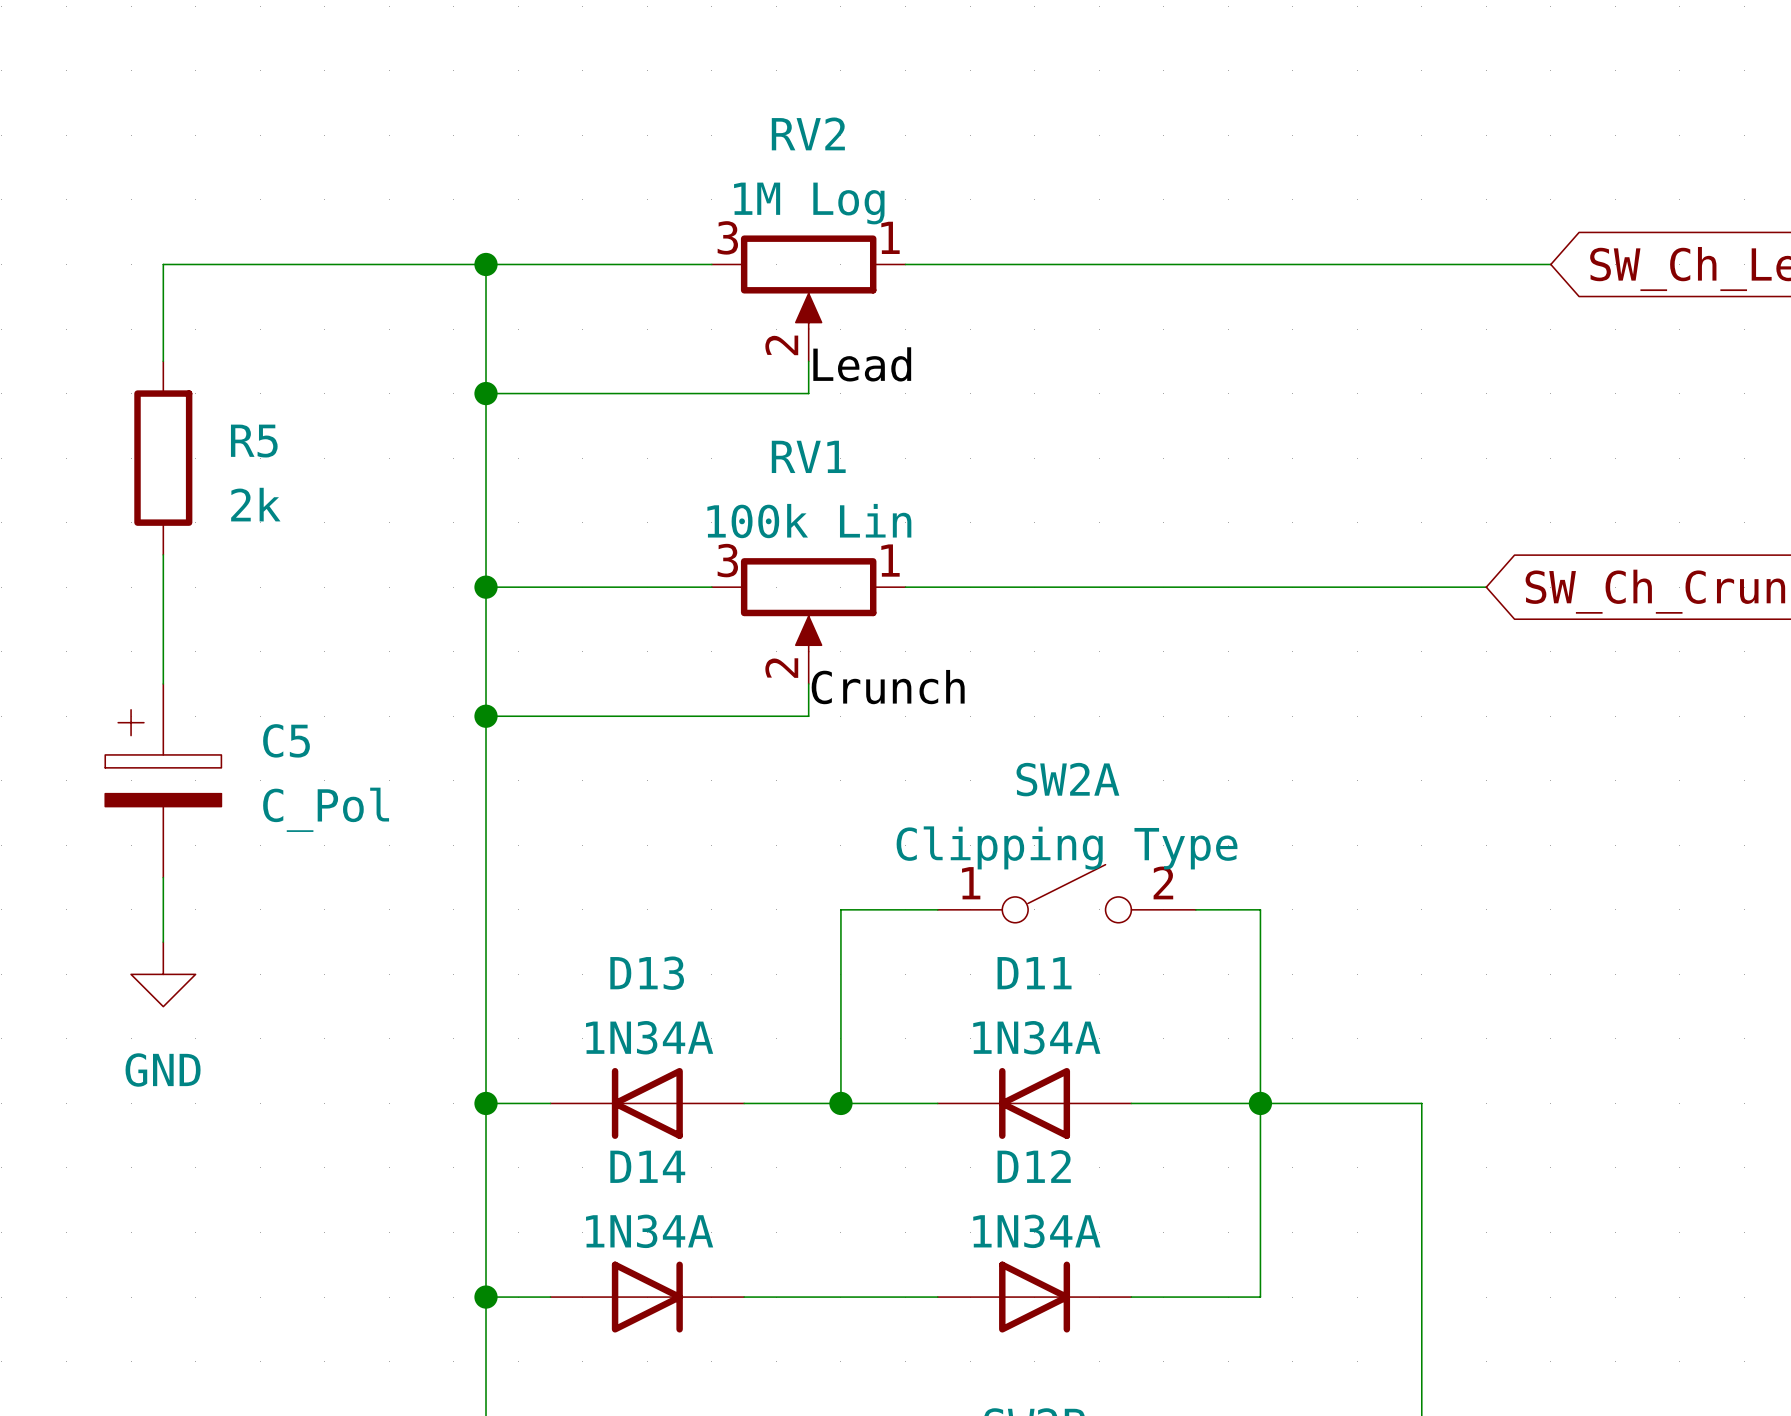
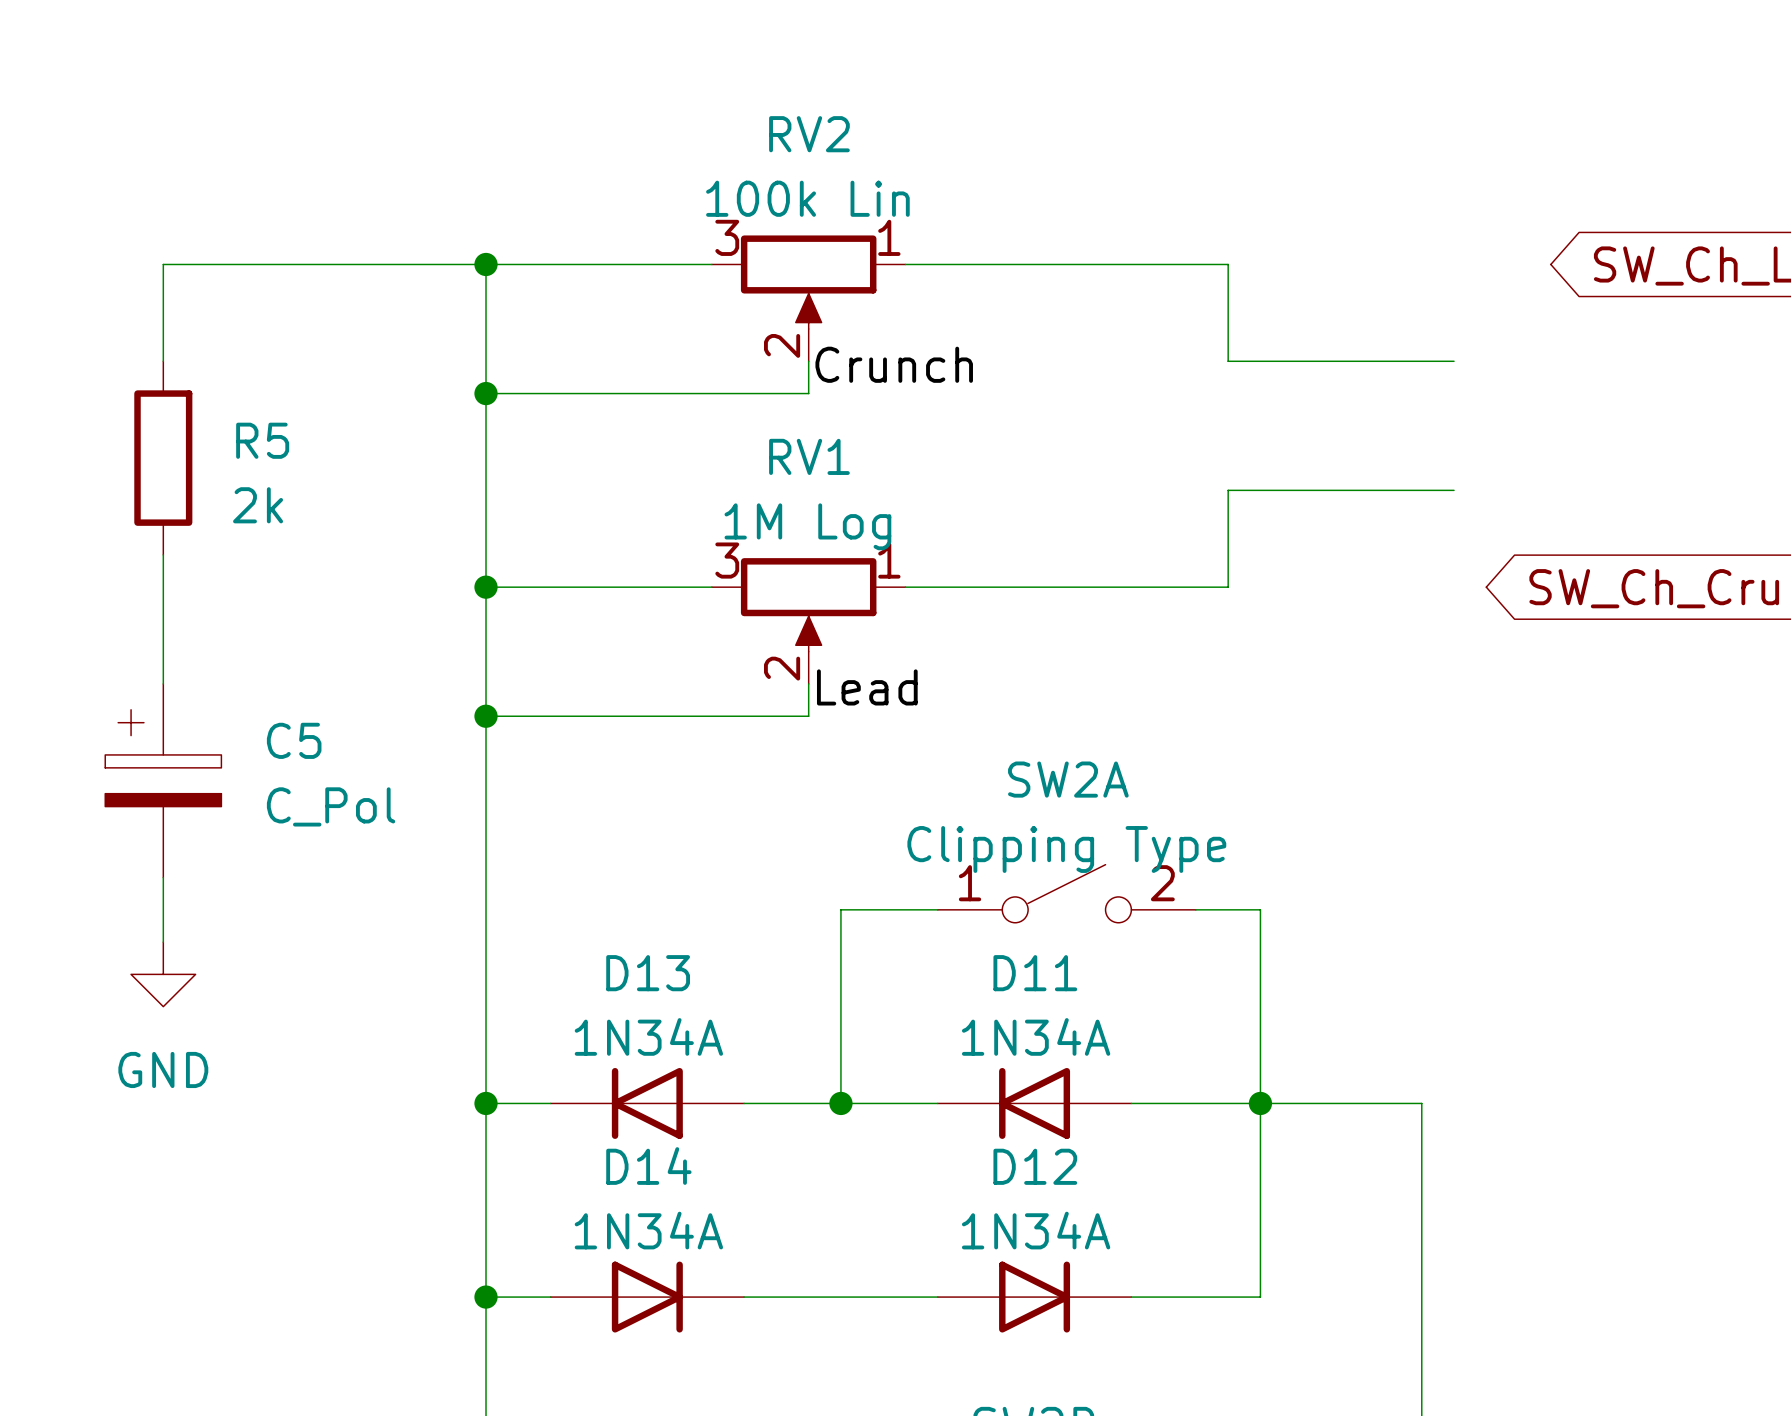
RV2 value: 1M Log (809, 203) -> 100k Lin (807, 198)
wire: (1228, 264) (1550, 264) -> (1228, 264) (1228, 361) (1454, 361)
label: Lead (862, 364) -> Crunch (894, 364)
RV1 value: 100k Lin (809, 521) -> 1M Log (807, 526)
wire: (1228, 587) (1486, 587) -> (1228, 587) (1228, 490) (1454, 490)
label: Crunch (888, 687) -> Lead (867, 687)

